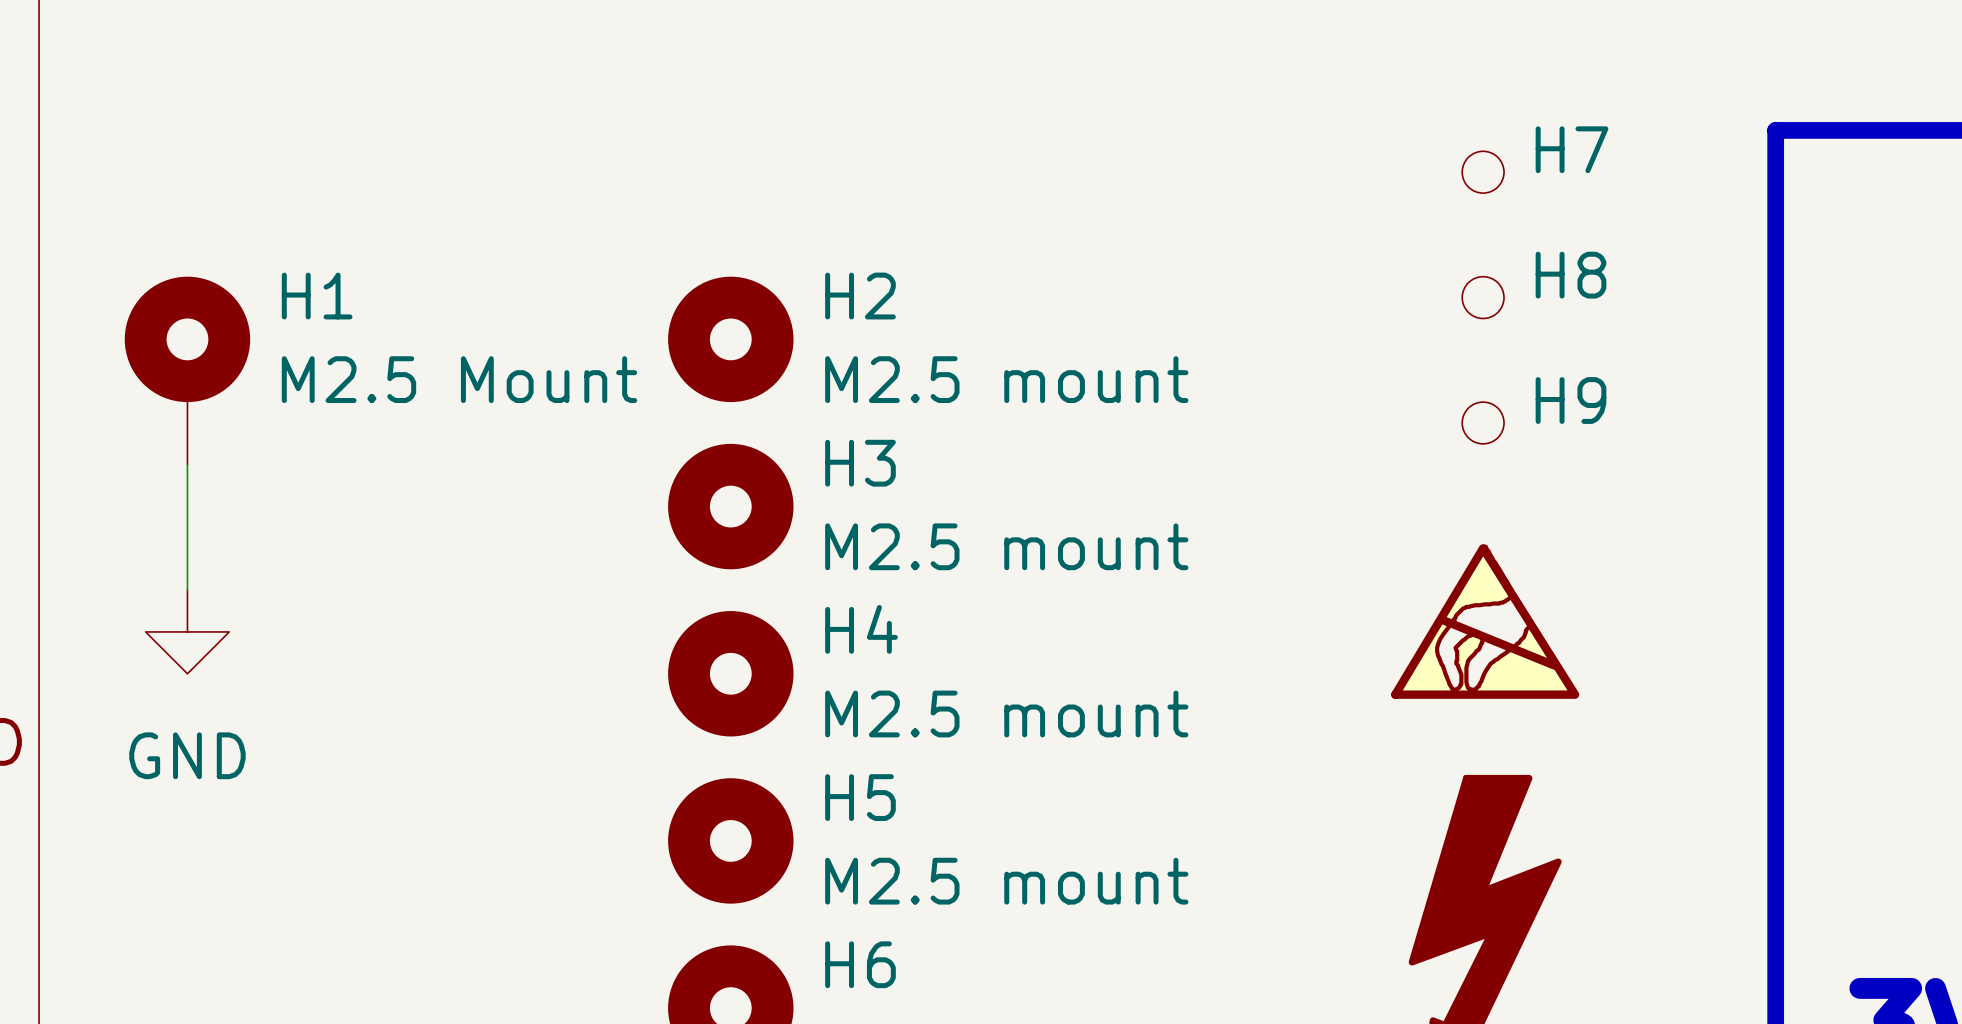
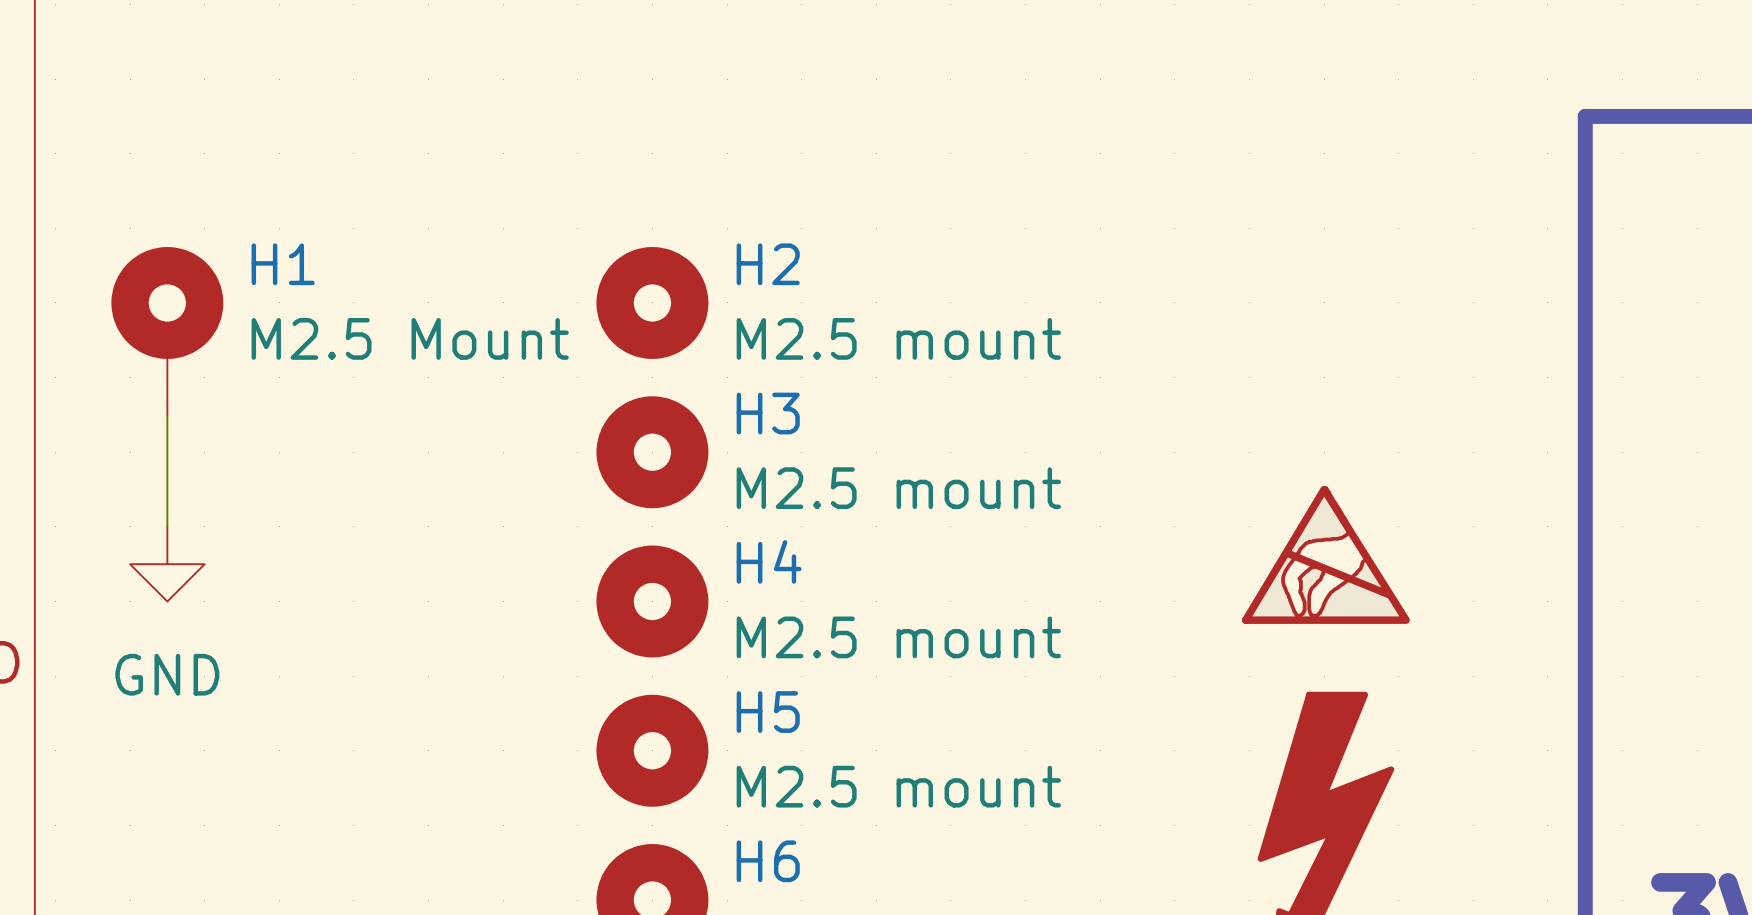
H7: (1483, 172) -> none
H8: (1483, 297) -> none
H9: (1483, 422) -> none

